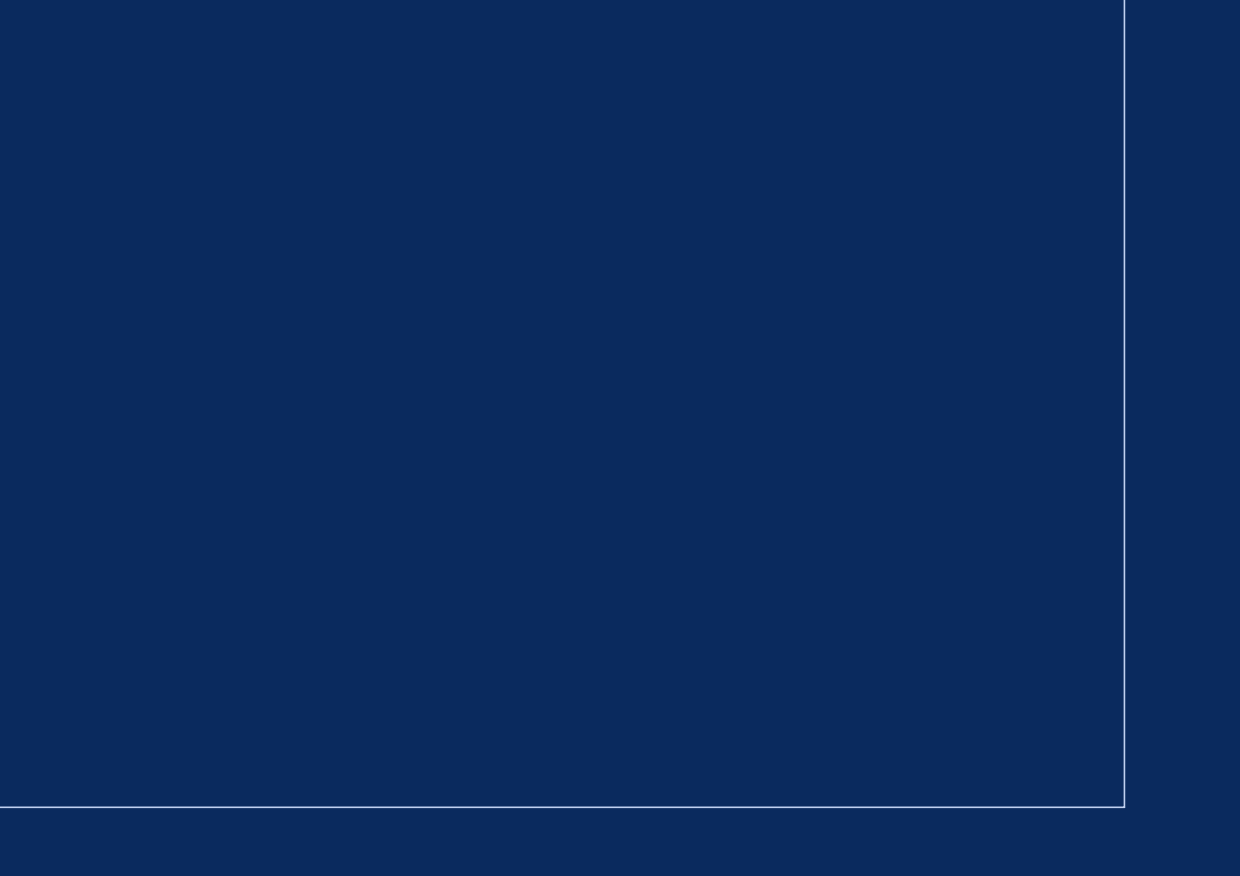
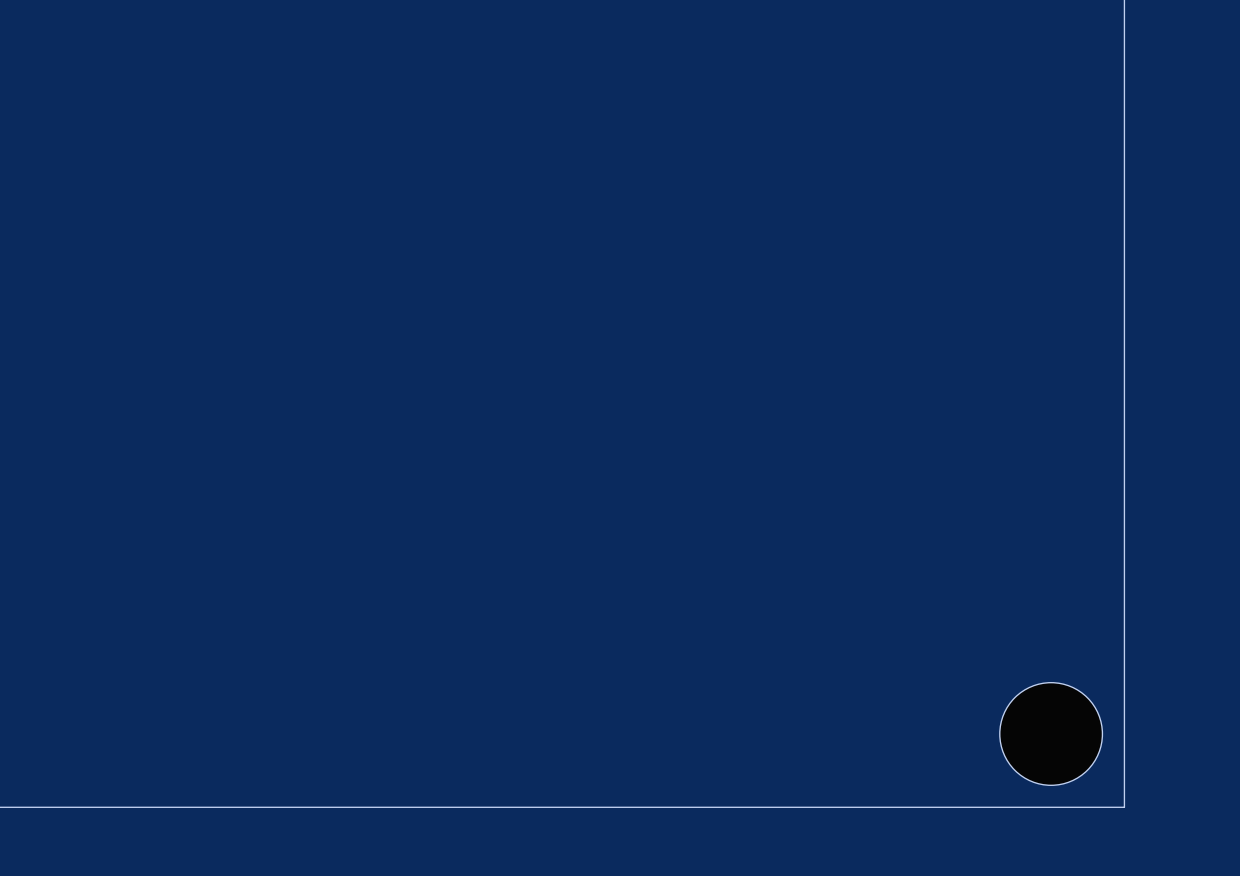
hole: none -> (1051, 733)

